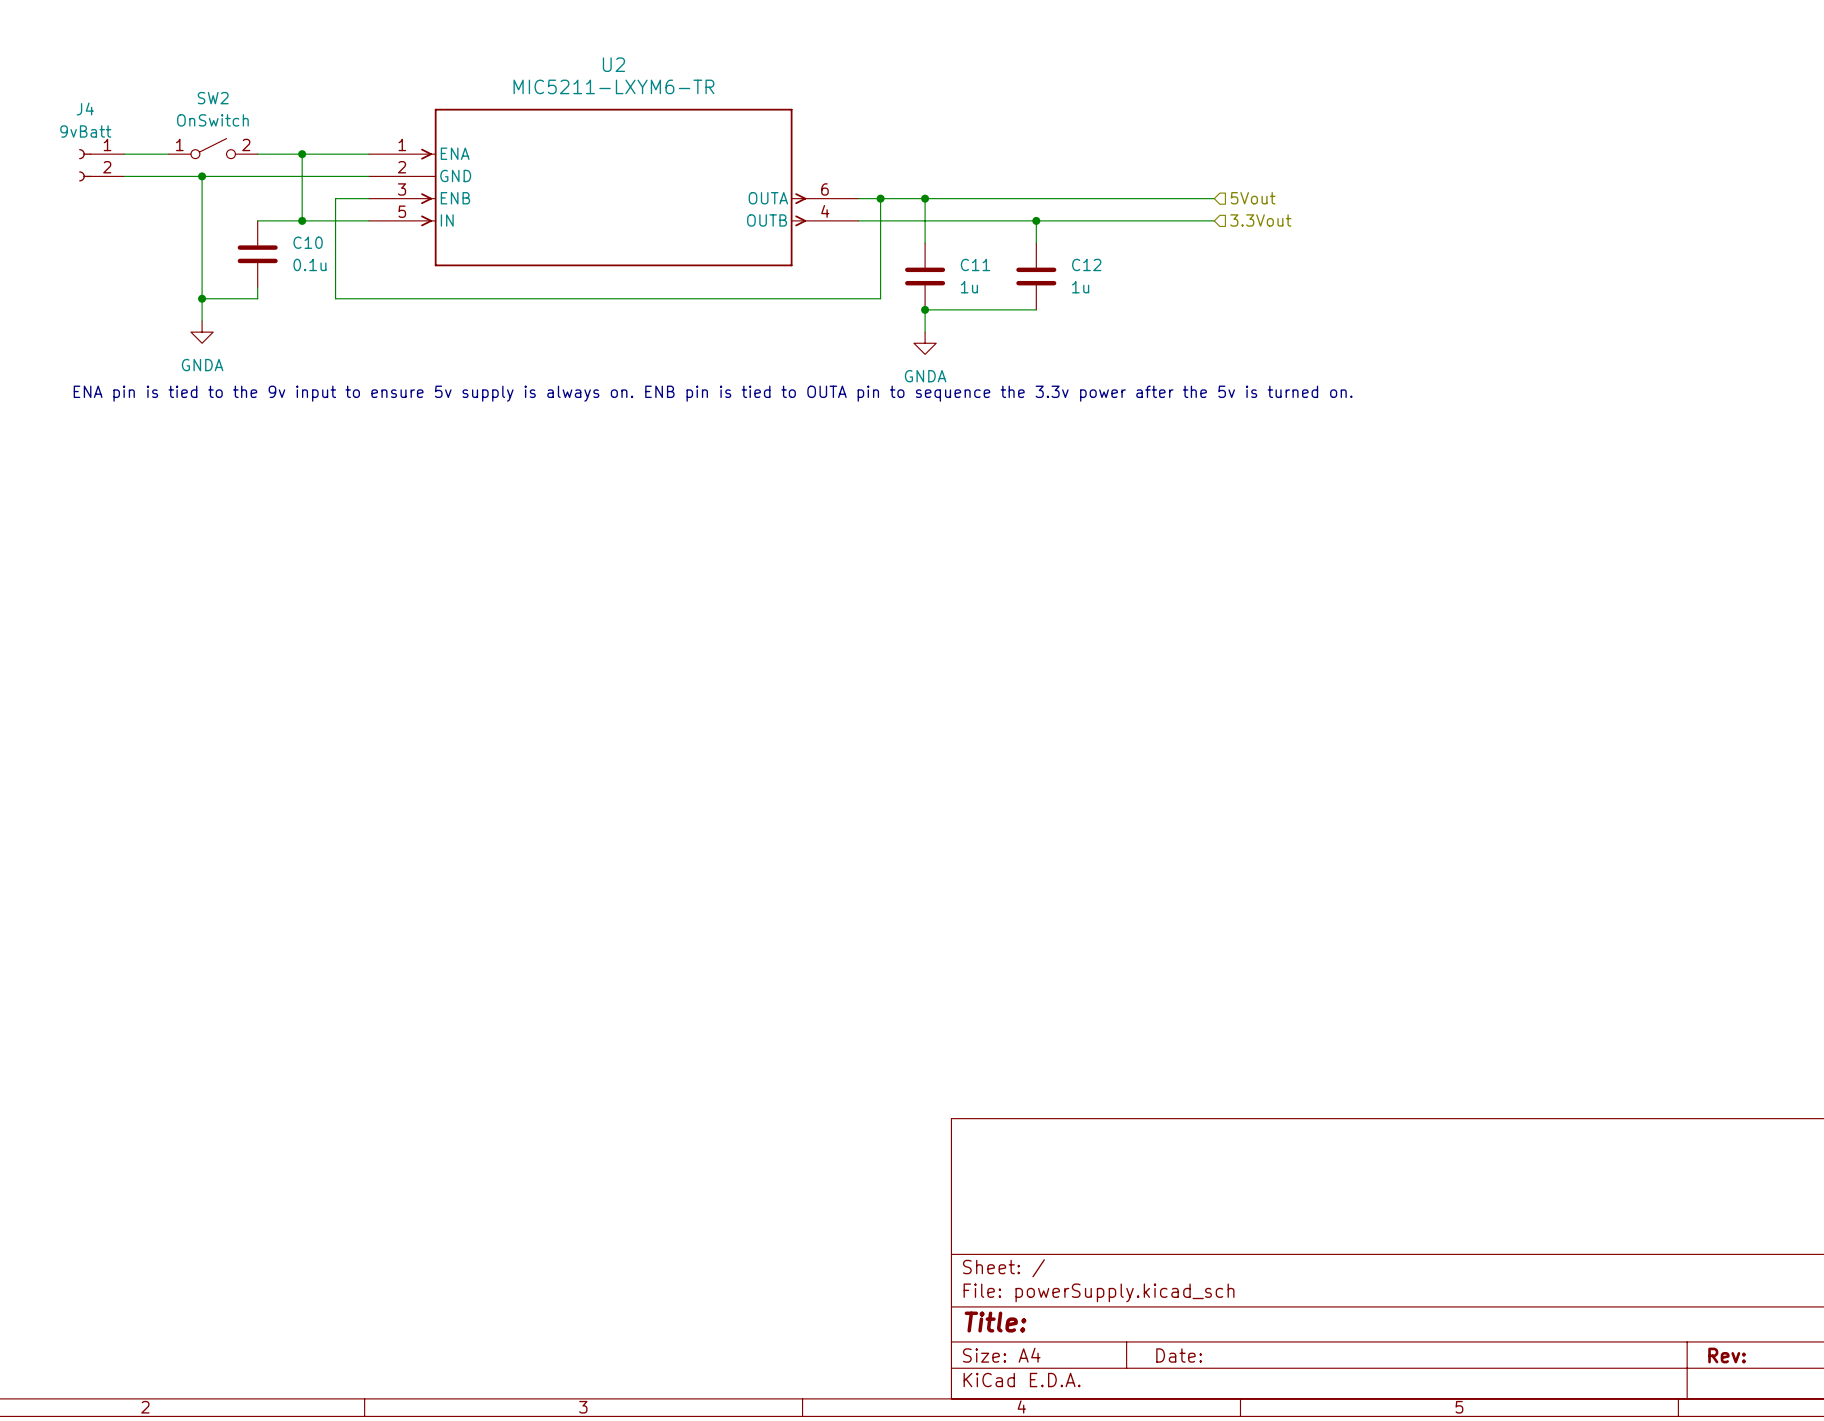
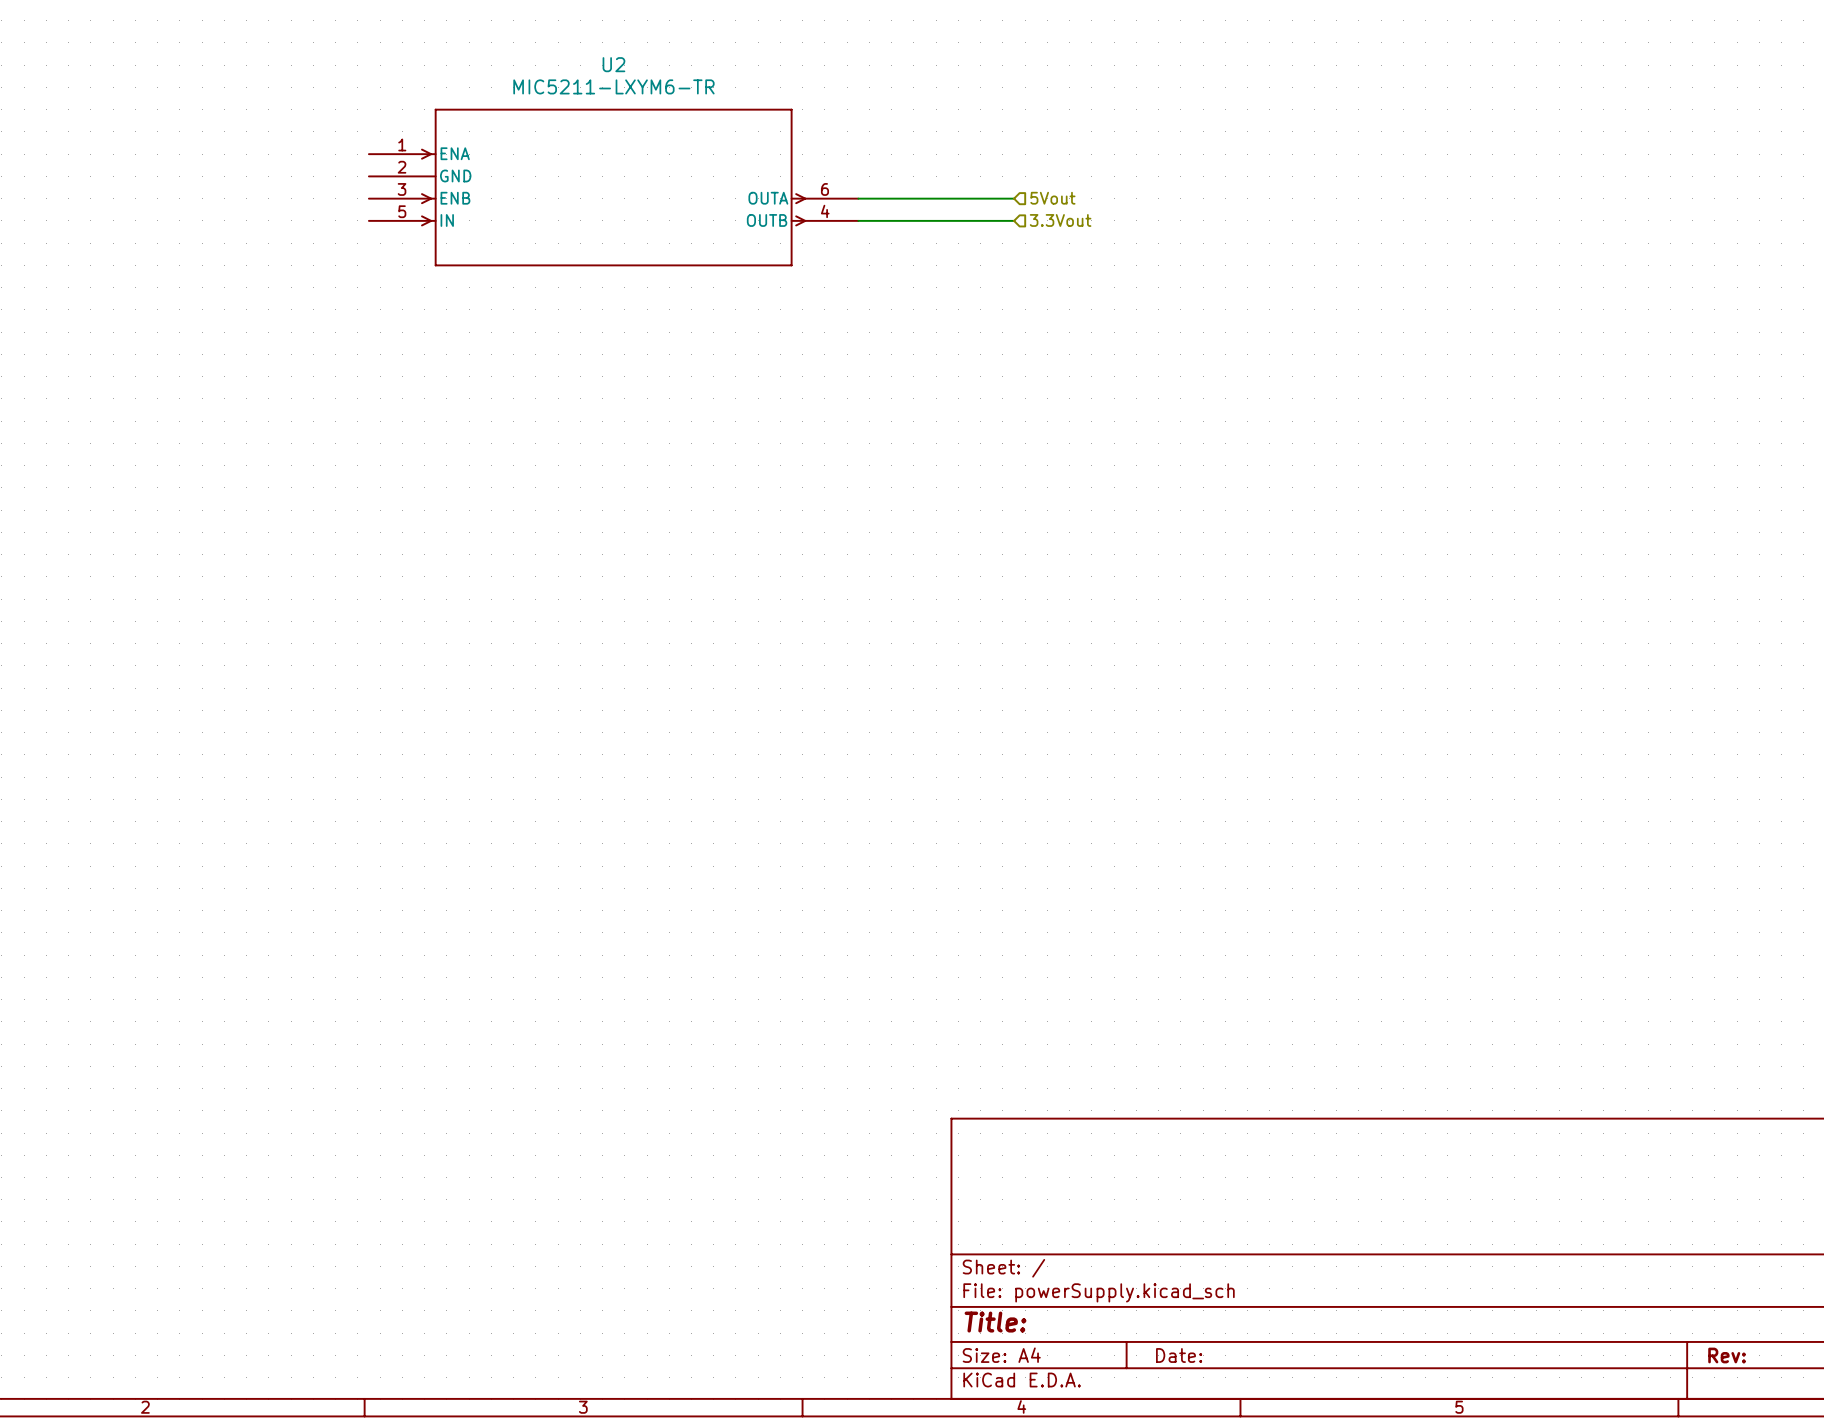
SW2: OnSwitch (213, 148) -> none
wire: (124, 154) (168, 154) -> none
wire: (257, 154) (368, 154) -> none
wire: (302, 154) (302, 220) -> none
junction: (302, 154) -> none
J4: 9vBatt (101, 165) -> none
wire: (124, 176) (368, 176) -> none
wire: (202, 176) (202, 321) -> none
junction: (202, 176) -> none
wire: (368, 198) (335, 198) (335, 298) (880, 298) (880, 198) -> none
junction: (880, 198) -> none
wire: (925, 198) (925, 243) -> none
junction: (925, 198) -> none
wire: (1014, 198) (1214, 198) -> none
hierarchical label position: 5Vout (1253, 198) -> 5Vout (1052, 198)
wire: (257, 220) (368, 220) -> none
junction: (302, 220) -> none
wire: (1014, 220) (1214, 220) -> none
wire: (1036, 220) (1036, 243) -> none
junction: (1036, 220) -> none
hierarchical label position: 3.3Vout (1260, 220) -> 3.3Vout (1060, 220)
C10: 0.1u (257, 254) -> none
C11: 1u (925, 276) -> none
C12: 1u (1036, 276) -> none
wire: (257, 287) (257, 298) (202, 298) -> none
junction: (202, 298) -> none
junction: (925, 309) -> none
wire: (1036, 309) (925, 309) (925, 332) -> none
power symbol: GNDA (202, 332) -> none
power symbol: GNDA (925, 343) -> none
text: ENA pin is tied to the 9v input to ensure 5v supply is always on. ENB pin is tied to OUTA pin to sequence the 3.3v power after the 5v is turned on. (713, 393) -> none

